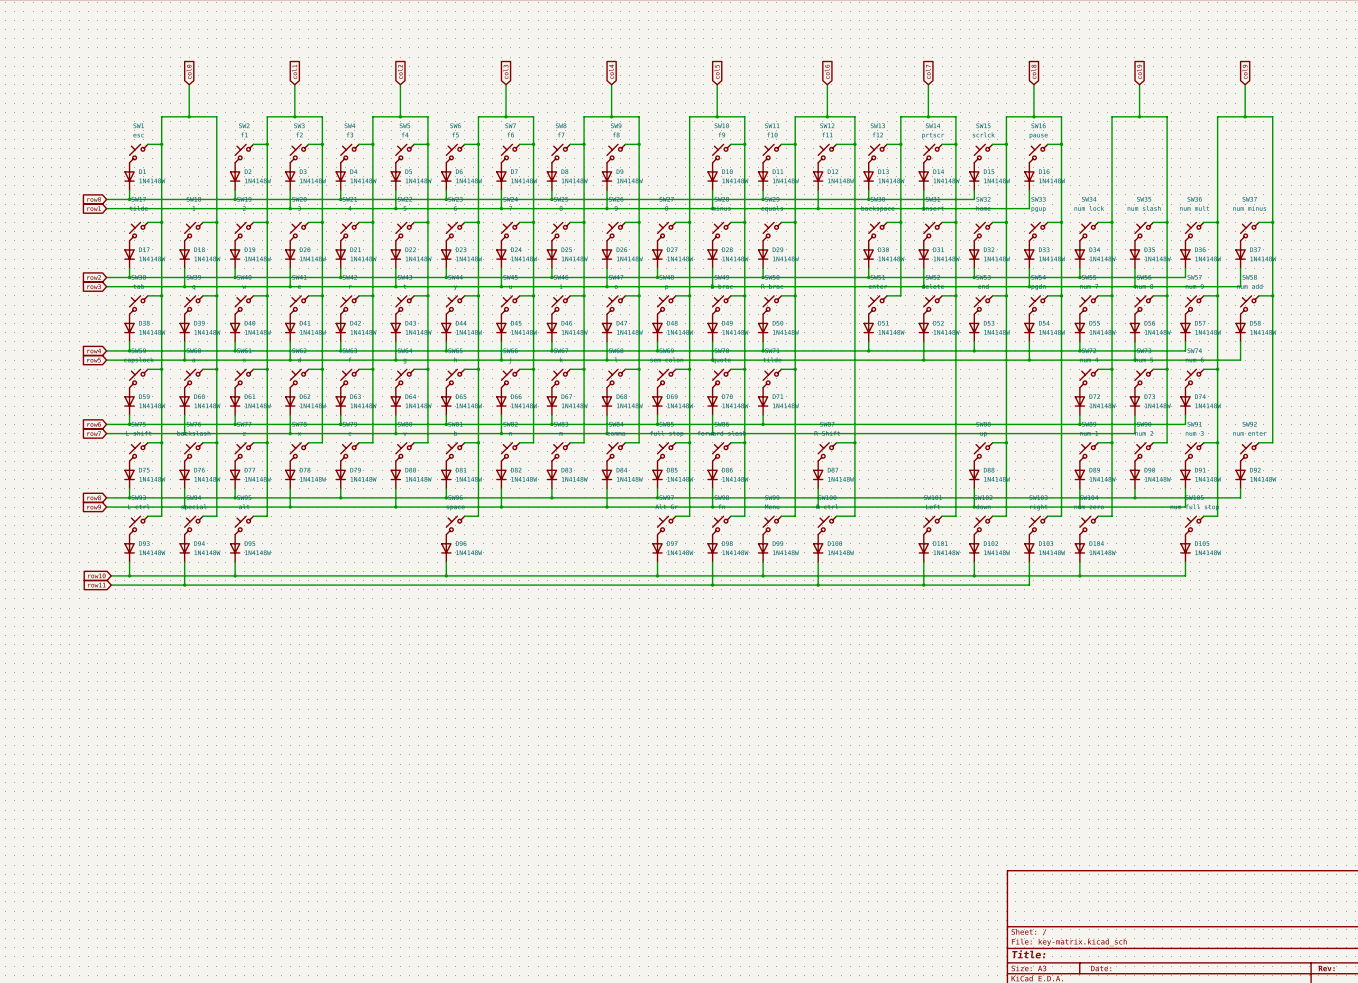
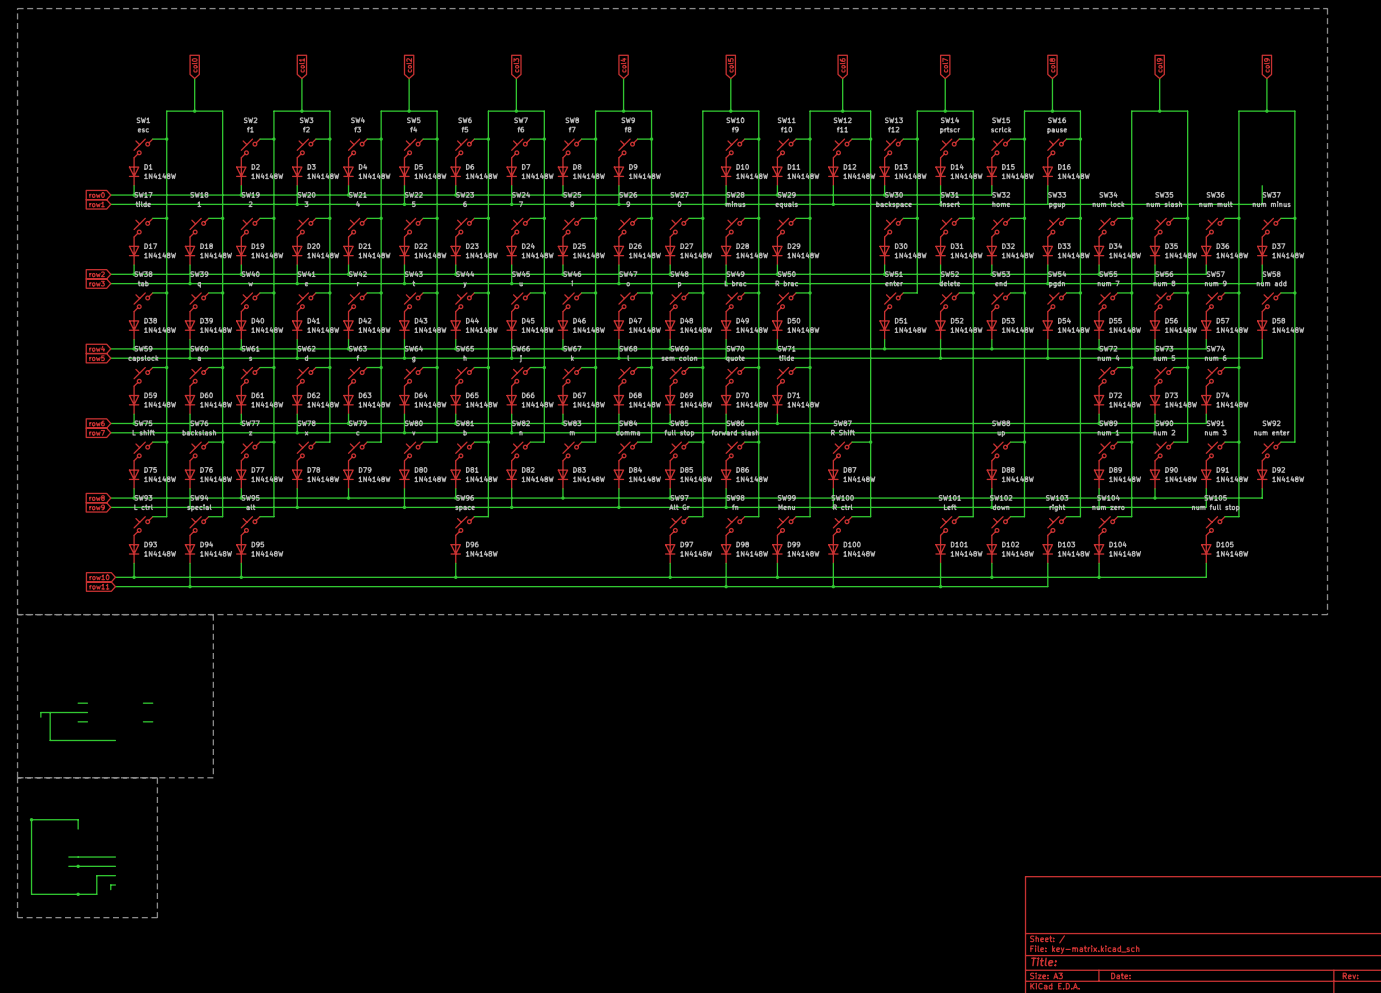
wire: none -> (1262, 185) (1262, 204) (1047, 204)
line: none -> (17, 614) (1327, 614) (1327, 8) (17, 8) (17, 917) (157, 917) (157, 777)
line: none -> (213, 614) (213, 777) (17, 777)
wire: none -> (78, 703) (87, 703)
wire: none -> (143, 703) (152, 703)
wire: none -> (50, 712) (50, 740) (115, 740)
wire: none -> (87, 712) (40, 712) (40, 717)
wire: none -> (78, 721) (87, 721)
wire: none -> (143, 721) (152, 721)
junction: none -> (31, 819)
wire: none -> (78, 829) (78, 819) (31, 819) (31, 894) (96, 894) (96, 875) (115, 875)
wire: none -> (68, 857) (115, 857)
wire: none -> (68, 866) (115, 866)
junction: none -> (78, 866)
wire: none -> (115, 884) (110, 884) (110, 889)
junction: none -> (78, 894)

